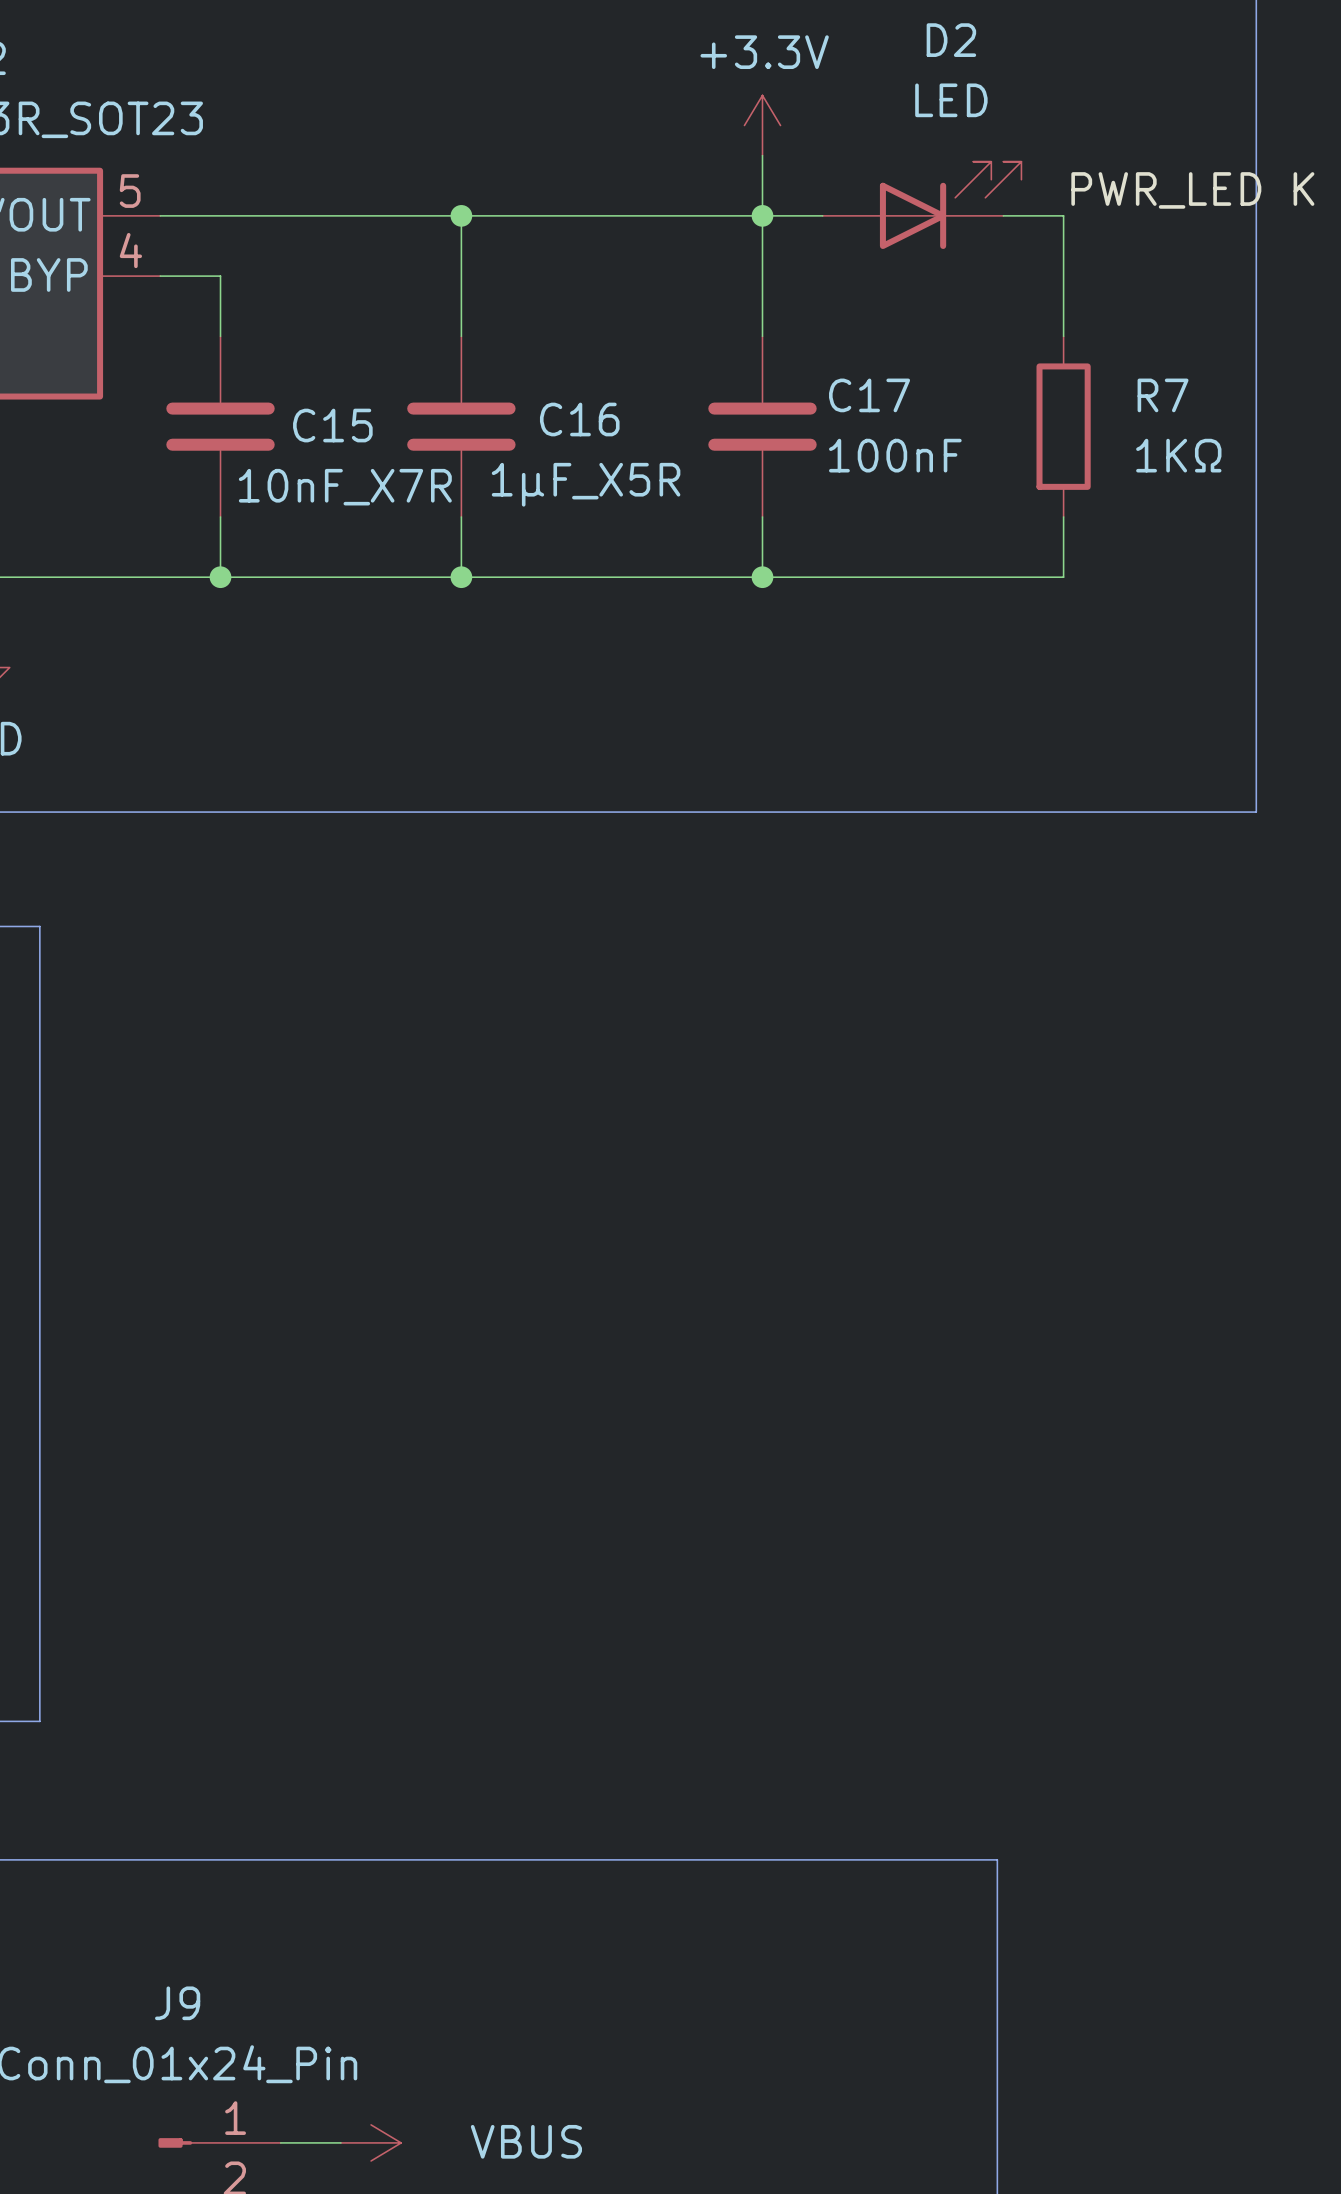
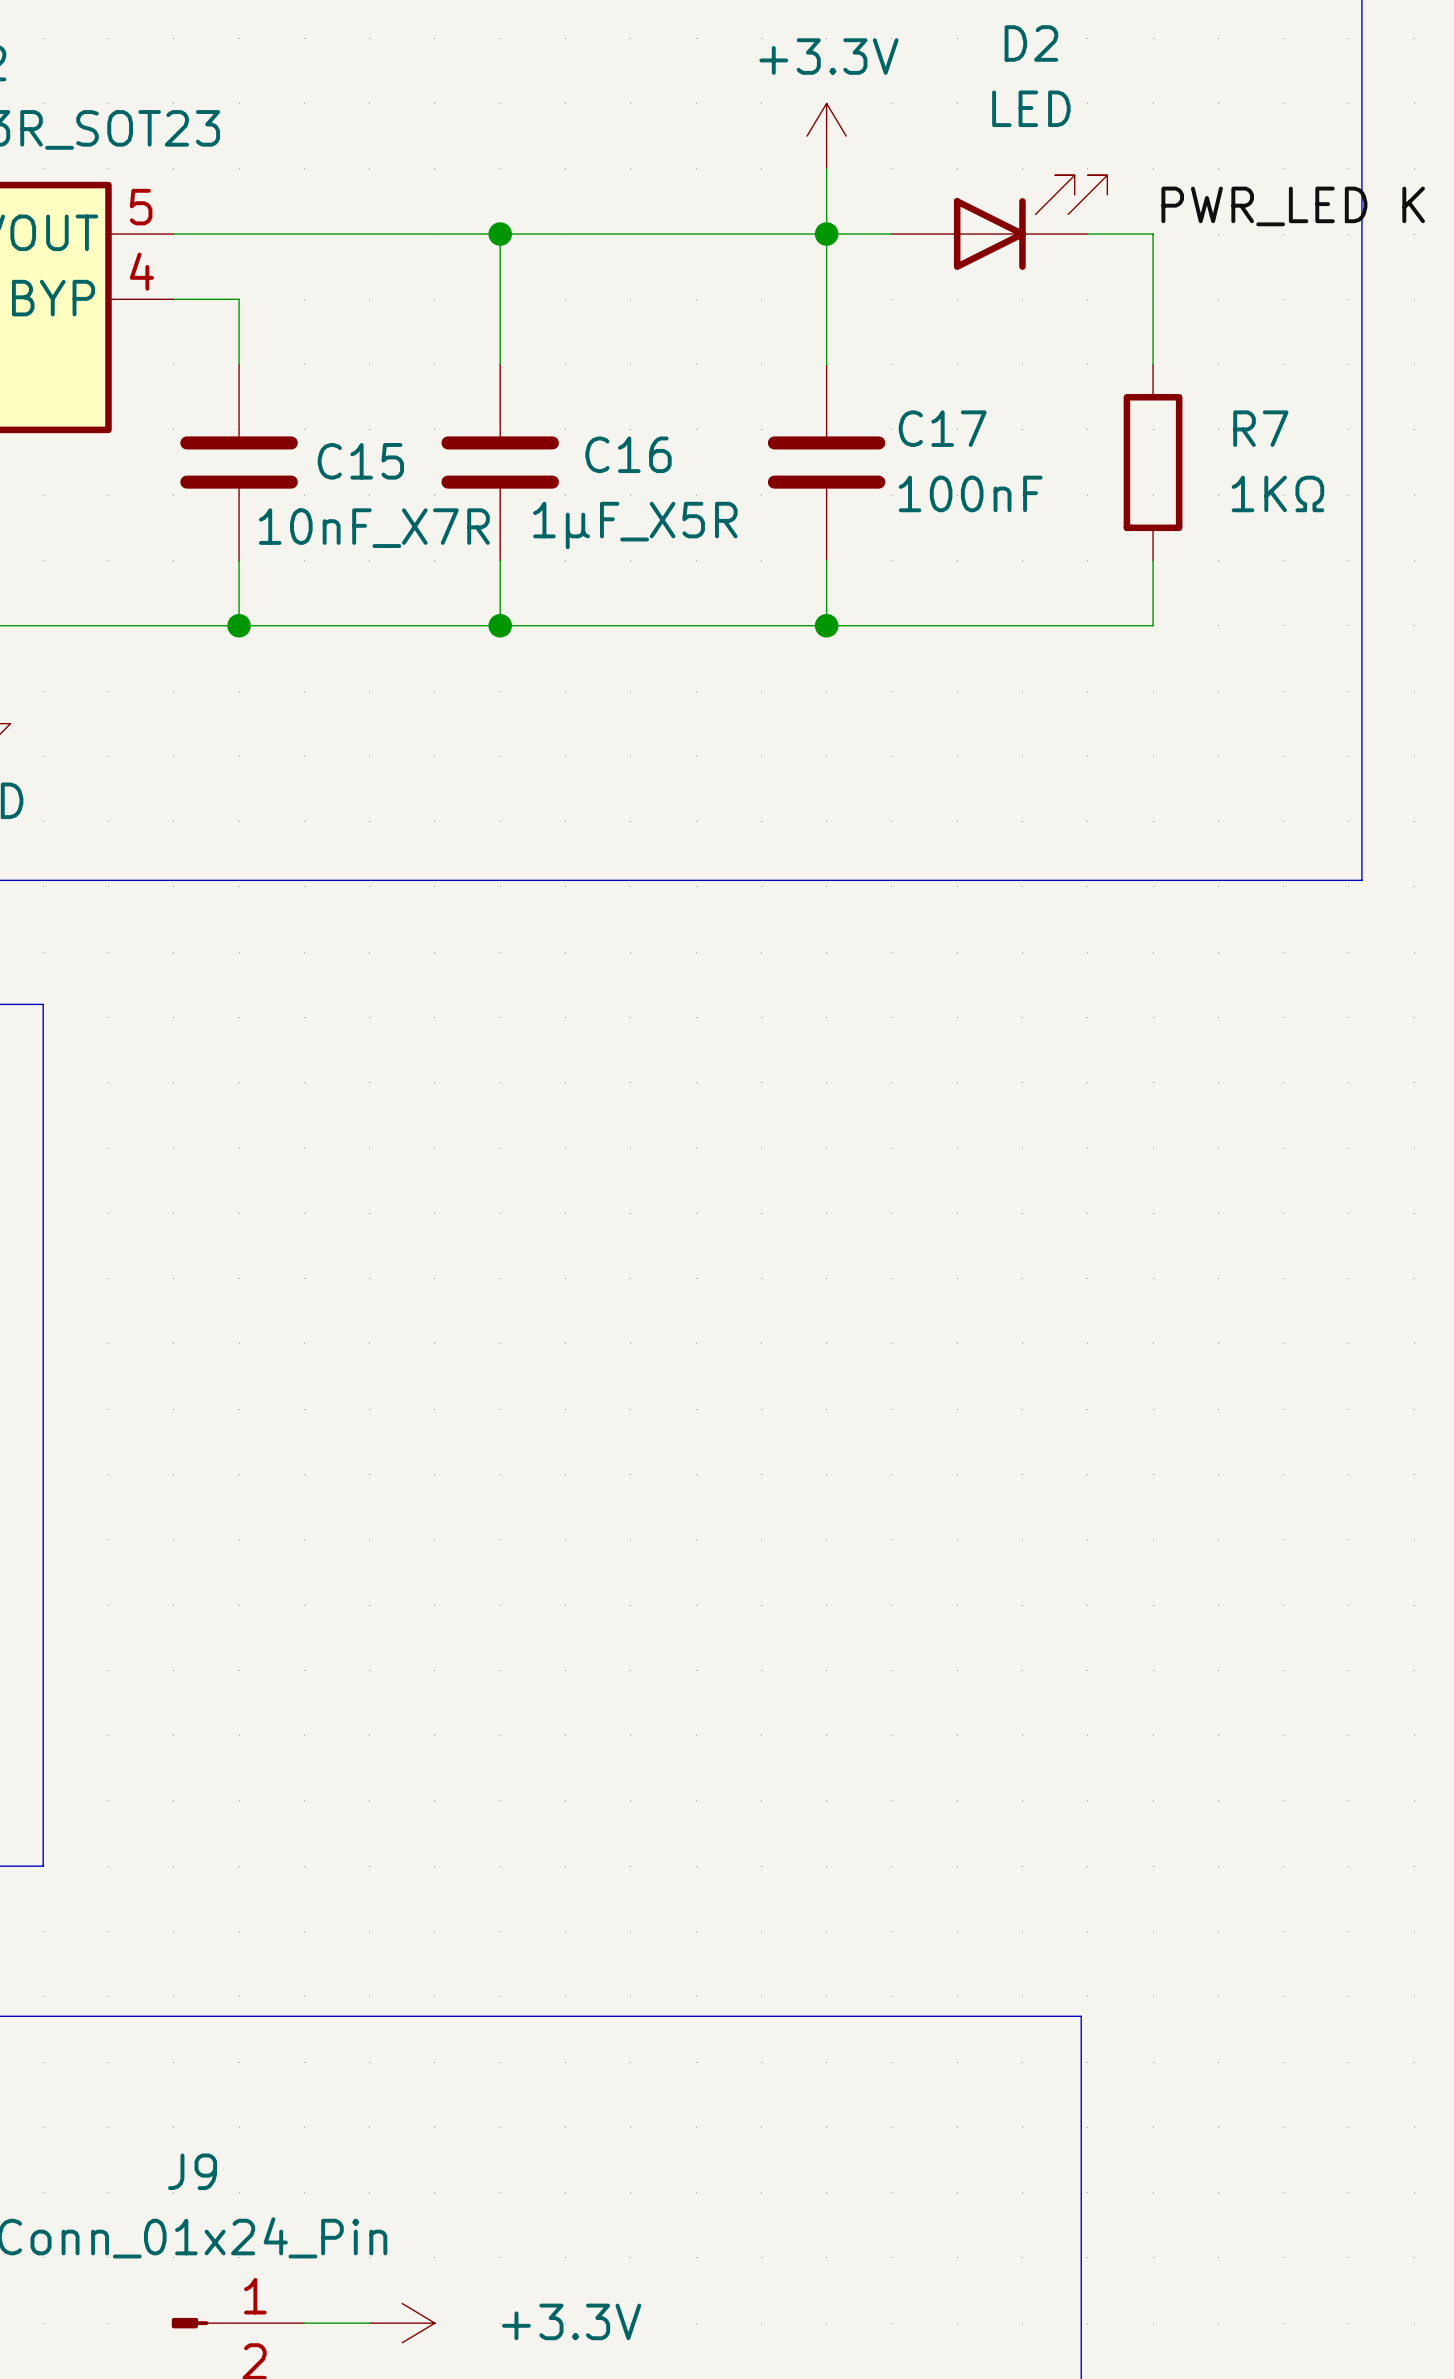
power symbol: VBUS (371, 2142) -> +3.3V (402, 2323)

